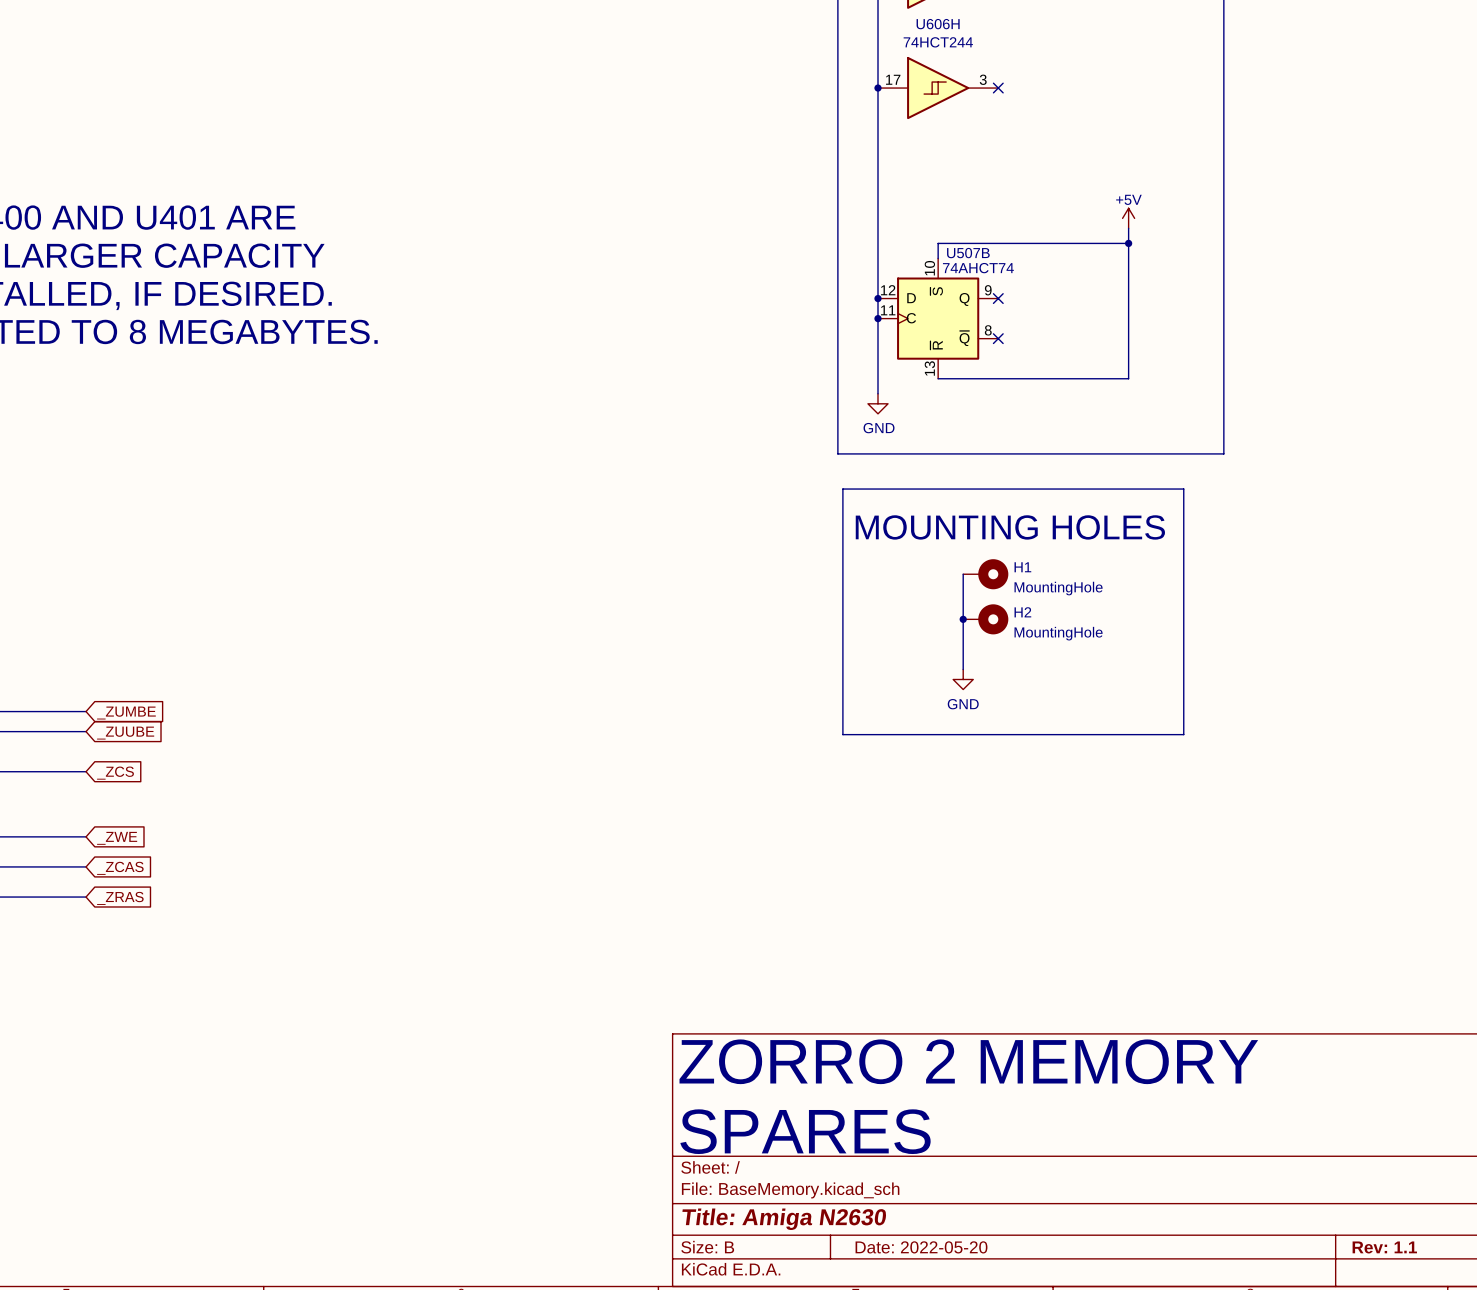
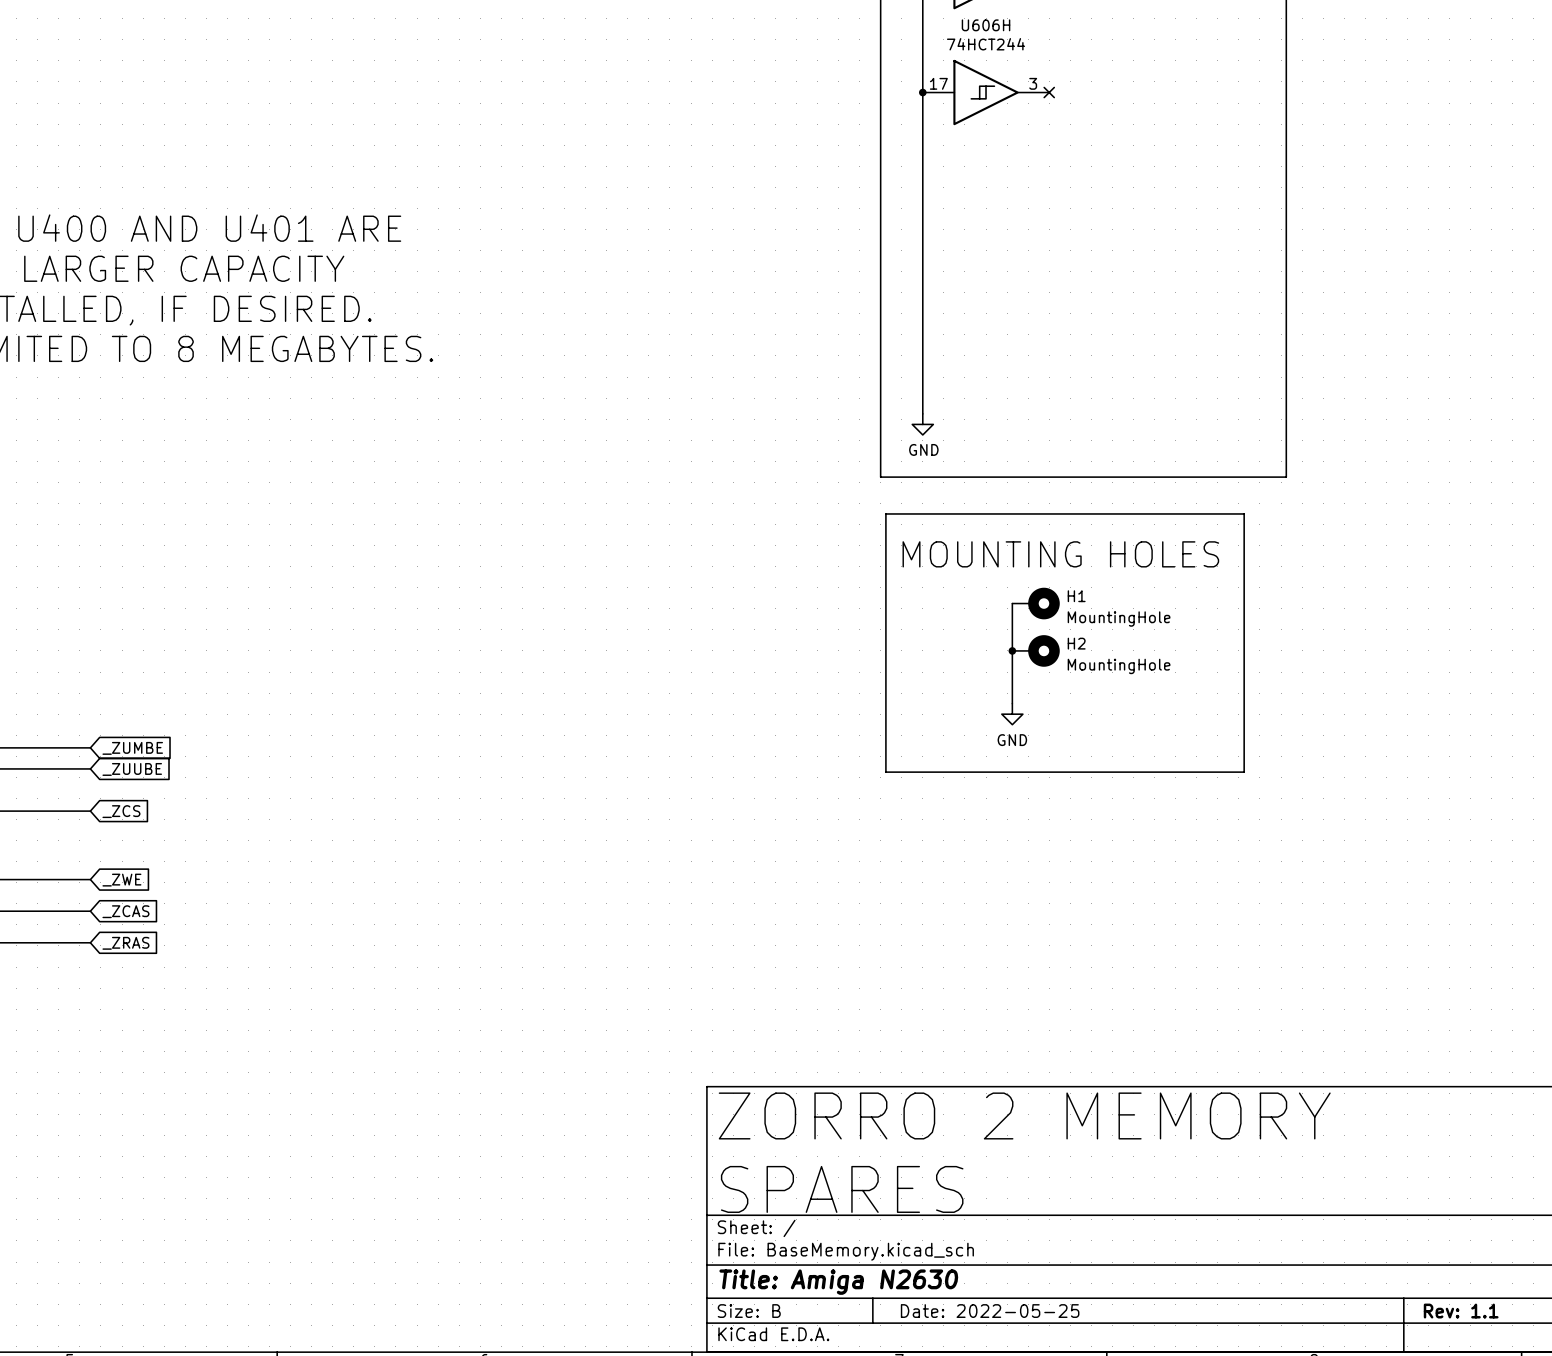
power symbol: +5V (1128, 218) -> none
wire: (1128, 228) (1128, 378) (938, 378) -> none
wire: (1128, 243) (938, 243) (938, 258) -> none
junction: (1128, 243) -> none
junction: (877, 298) -> none
no-connect mark: (998, 298) -> none
junction: (877, 318) -> none
U507B: 74AHCT74 (938, 318) -> none
no-connect mark: (998, 338) -> none
title block: Date: 2022-05-20 (921, 1247) -> Date: 2022-05-25 (990, 1311)

